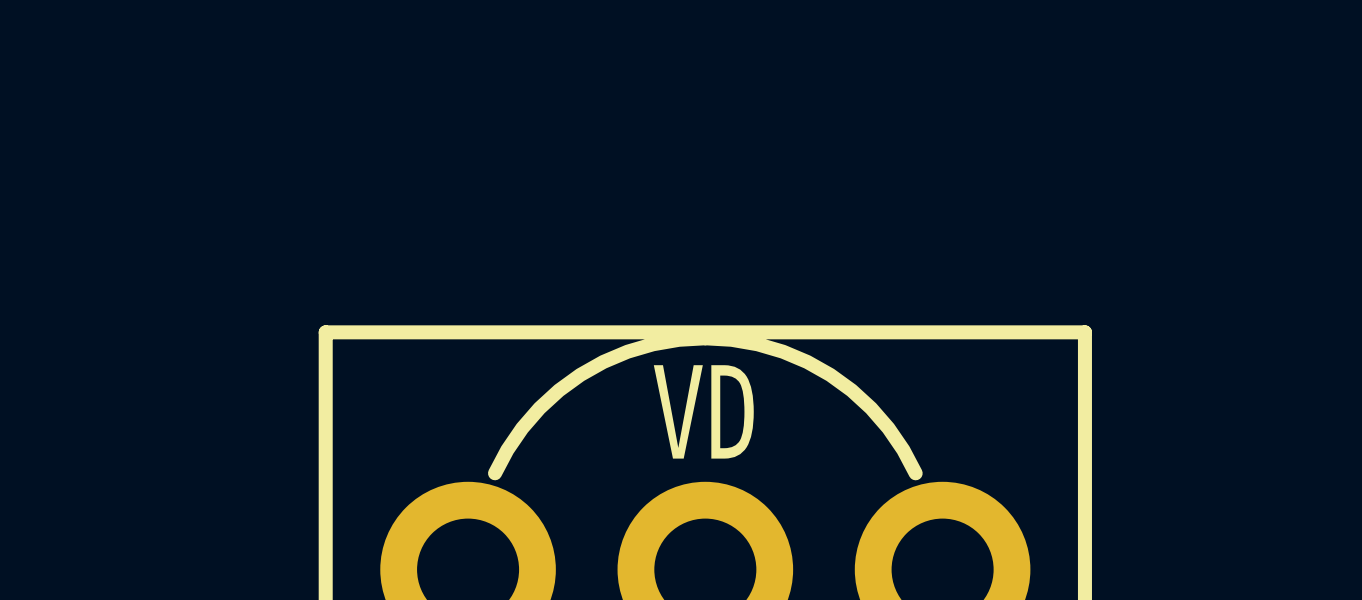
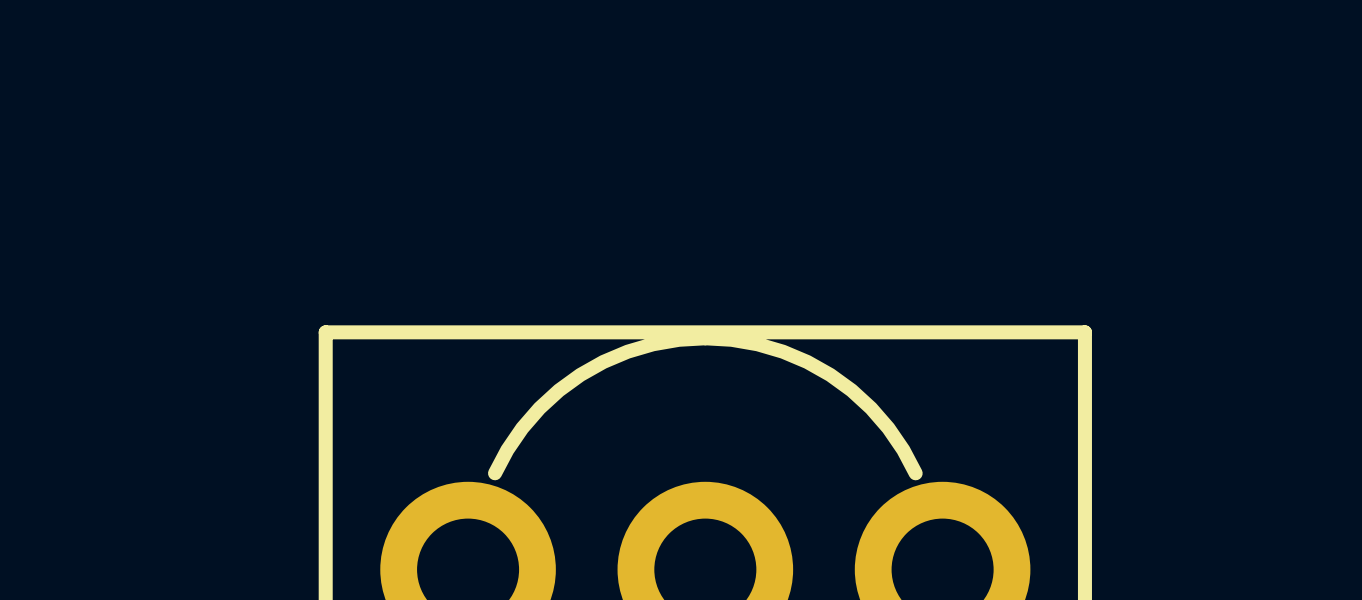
text: VD (703, 411) -> none

